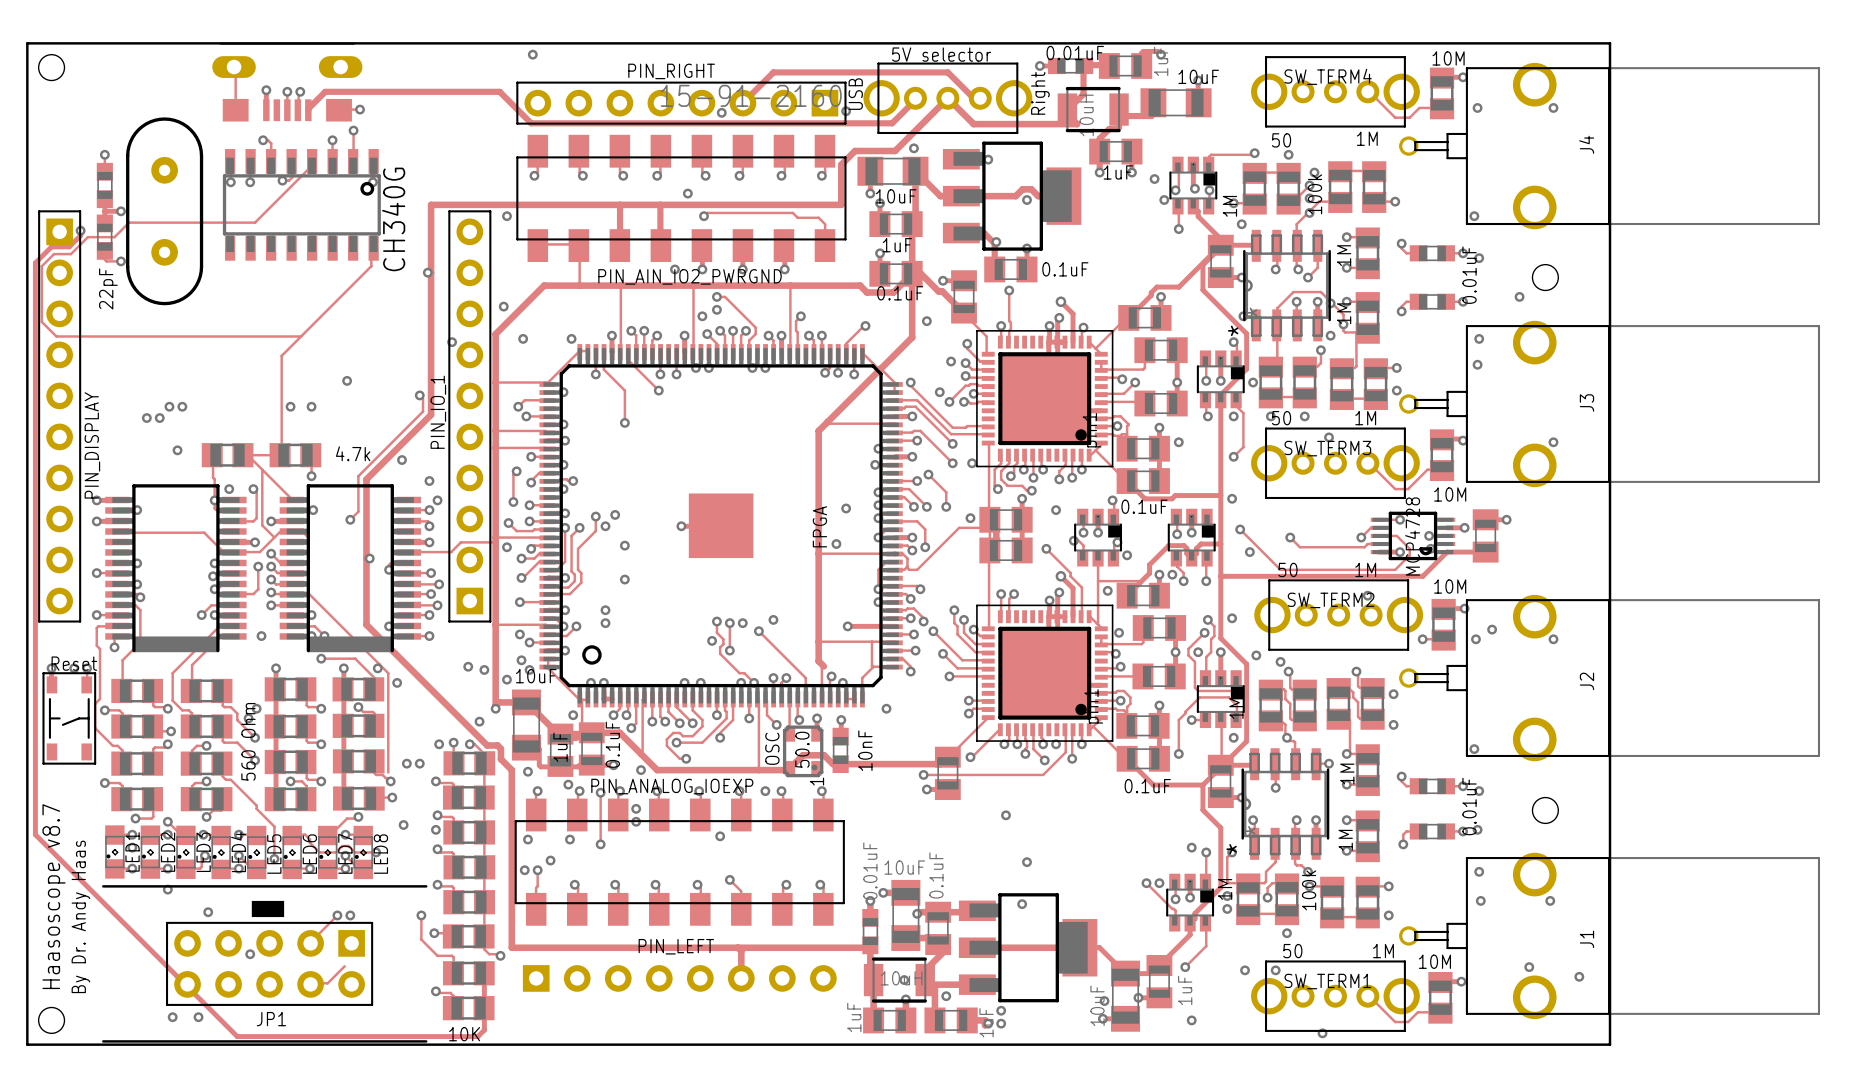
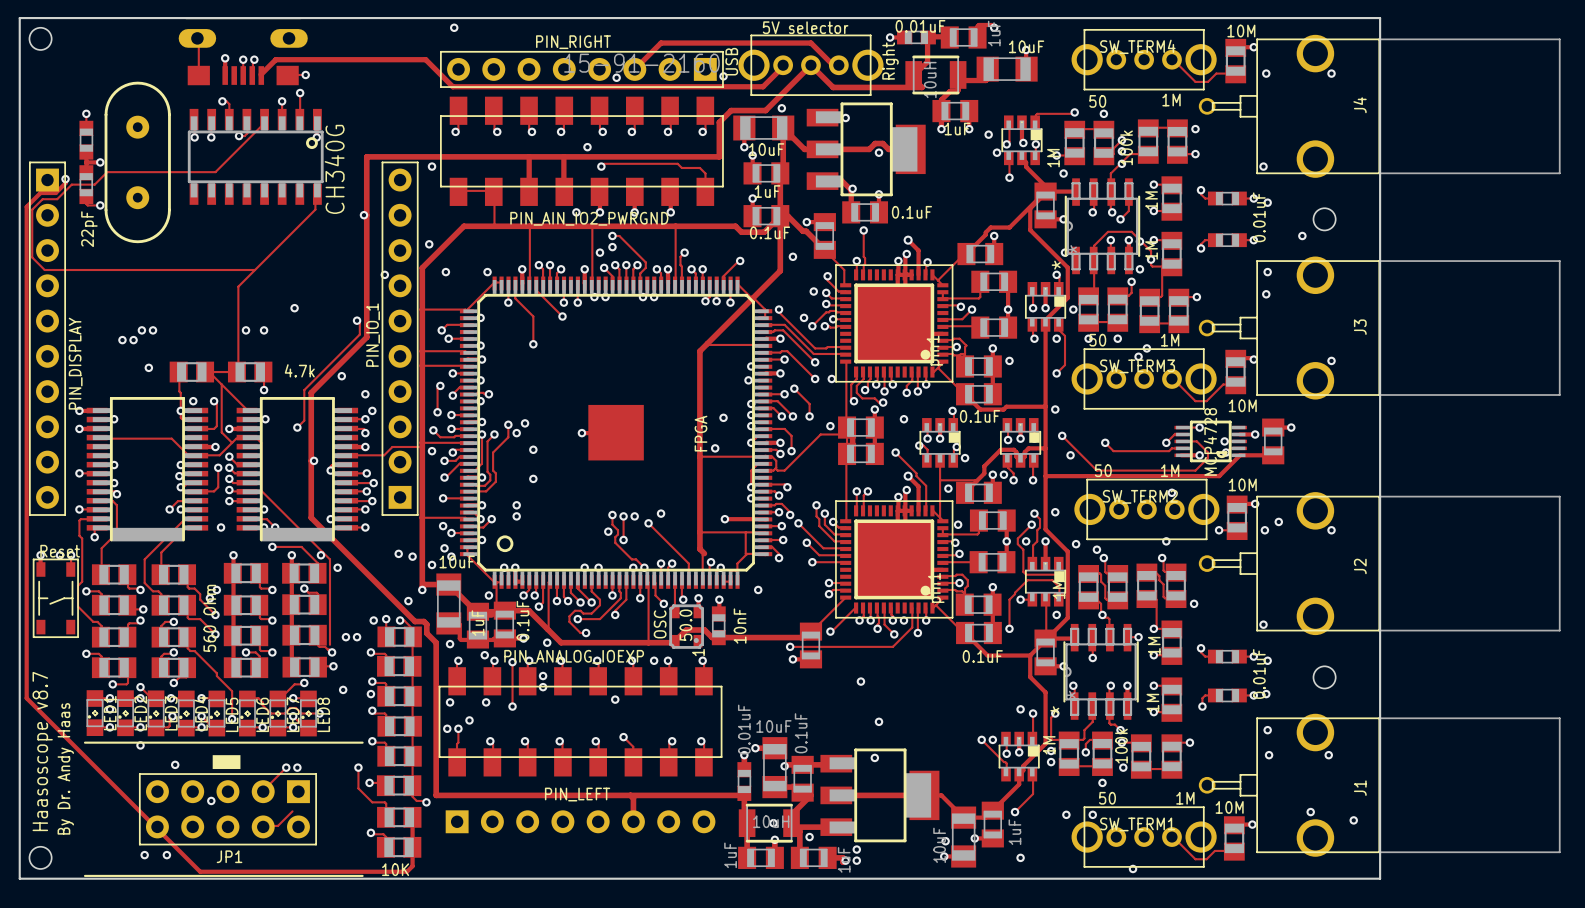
via position: (1314, 172) -> (1195, 129)
via position: (1396, 390) -> (1146, 348)
via position: (1393, 694) -> (1166, 541)
via position: (1388, 915) -> (1123, 767)

